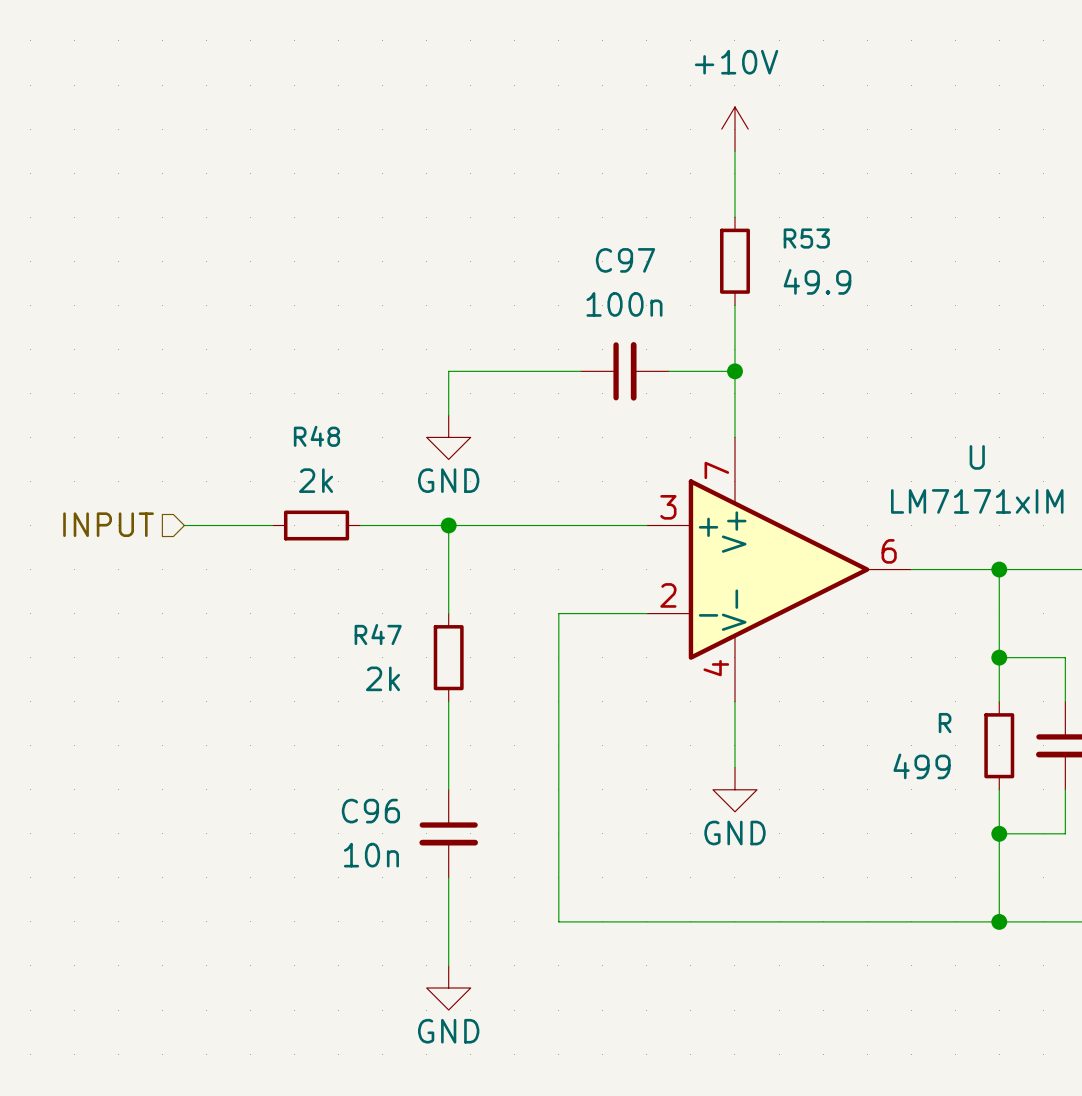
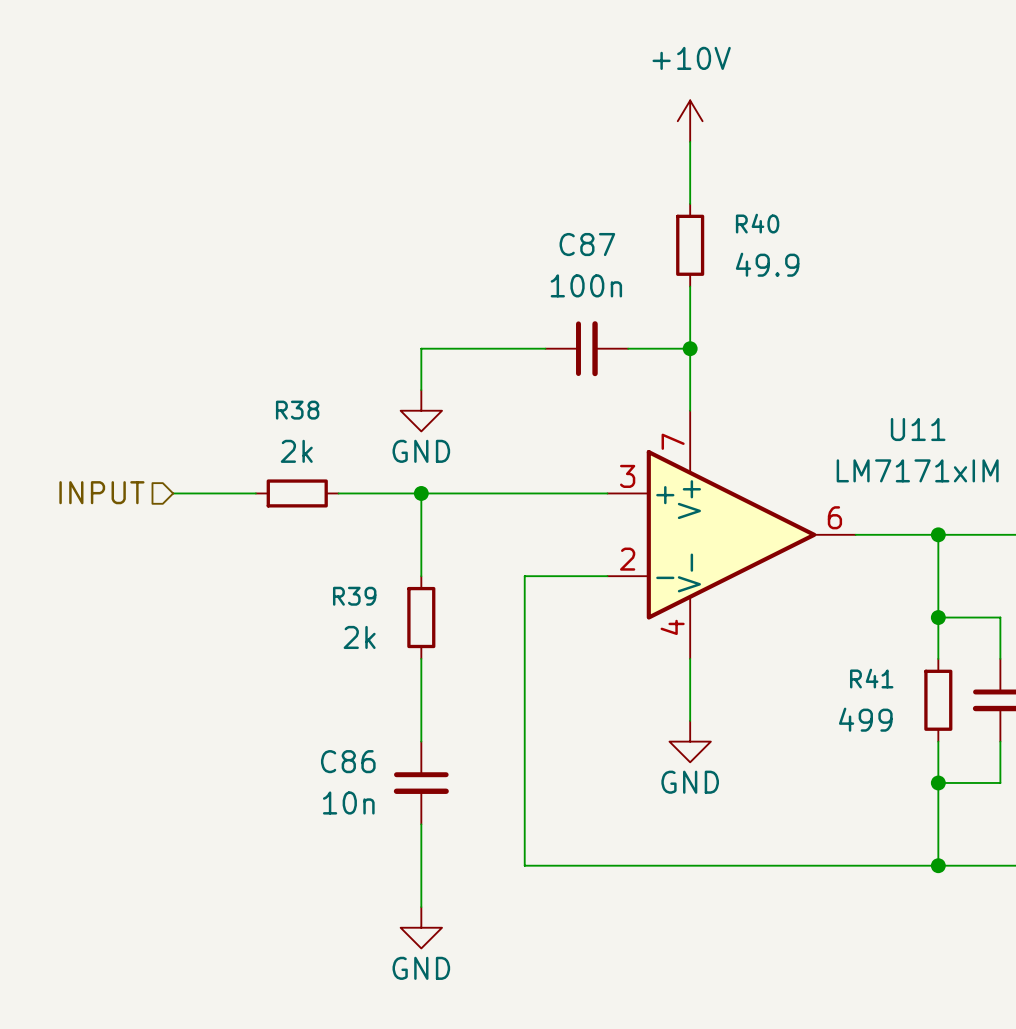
R53 name: R53 (806, 238) -> R40 (757, 223)
C97 name: C97 (625, 260) -> C87 (587, 244)
R48 name: R48 (316, 436) -> R38 (297, 410)
U name: U (977, 457) -> U11 (918, 429)
R47 name: R47 (378, 634) -> R39 (354, 596)
R name: R (945, 723) -> R41 (871, 678)
C96 name: C96 (370, 811) -> C86 (348, 761)

